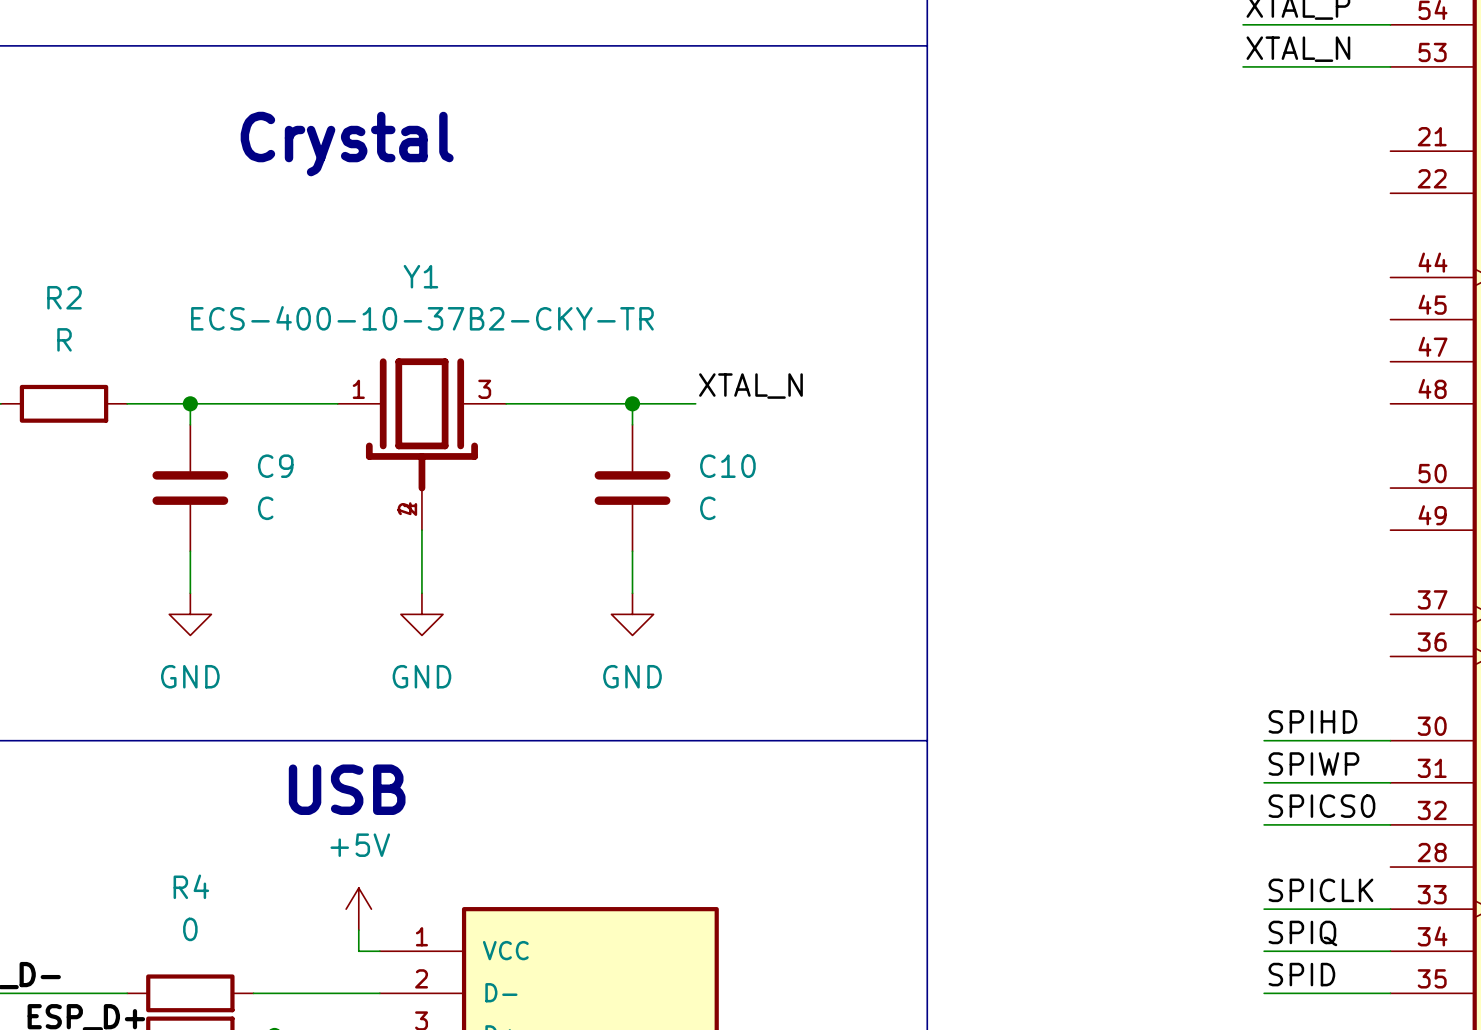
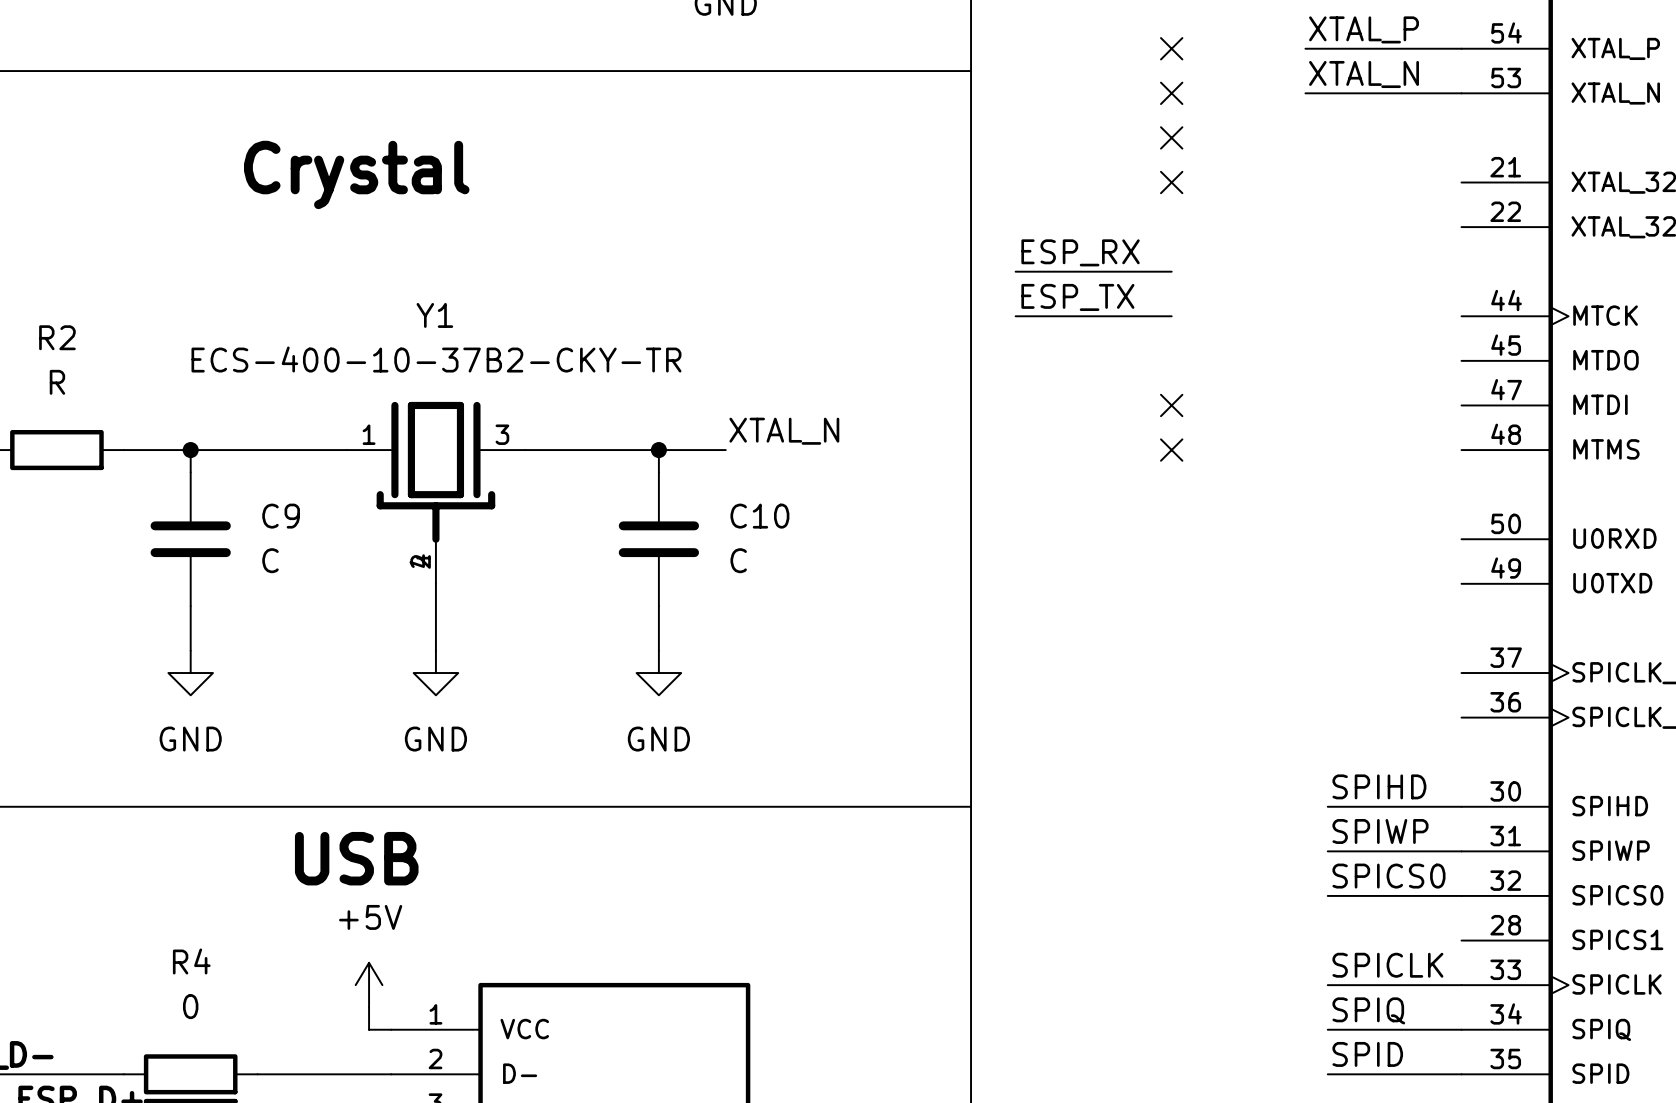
no-connect mark: none -> (1171, 48)
no-connect mark: none -> (1171, 93)
no-connect mark: none -> (1171, 137)
no-connect mark: none -> (1171, 182)
label: none -> ESP_RX (1080, 252)
wire: none -> (1015, 271) (1171, 271)
label: none -> ESP_TX (1077, 297)
wire: none -> (1015, 316) (1171, 316)
no-connect mark: none -> (1171, 405)
no-connect mark: none -> (1171, 450)

